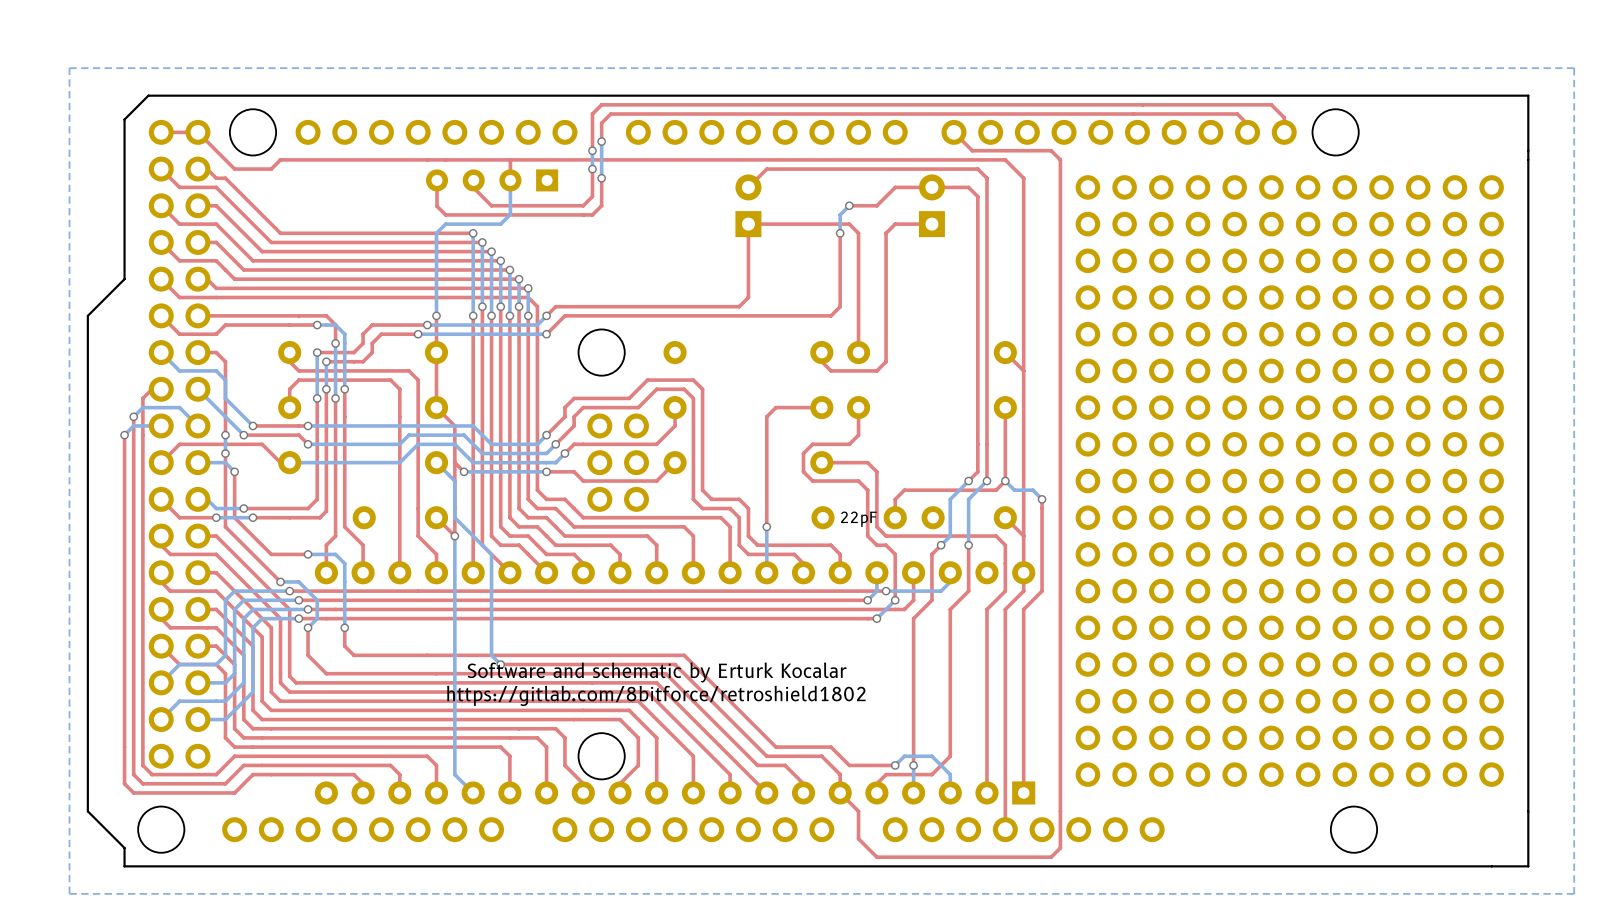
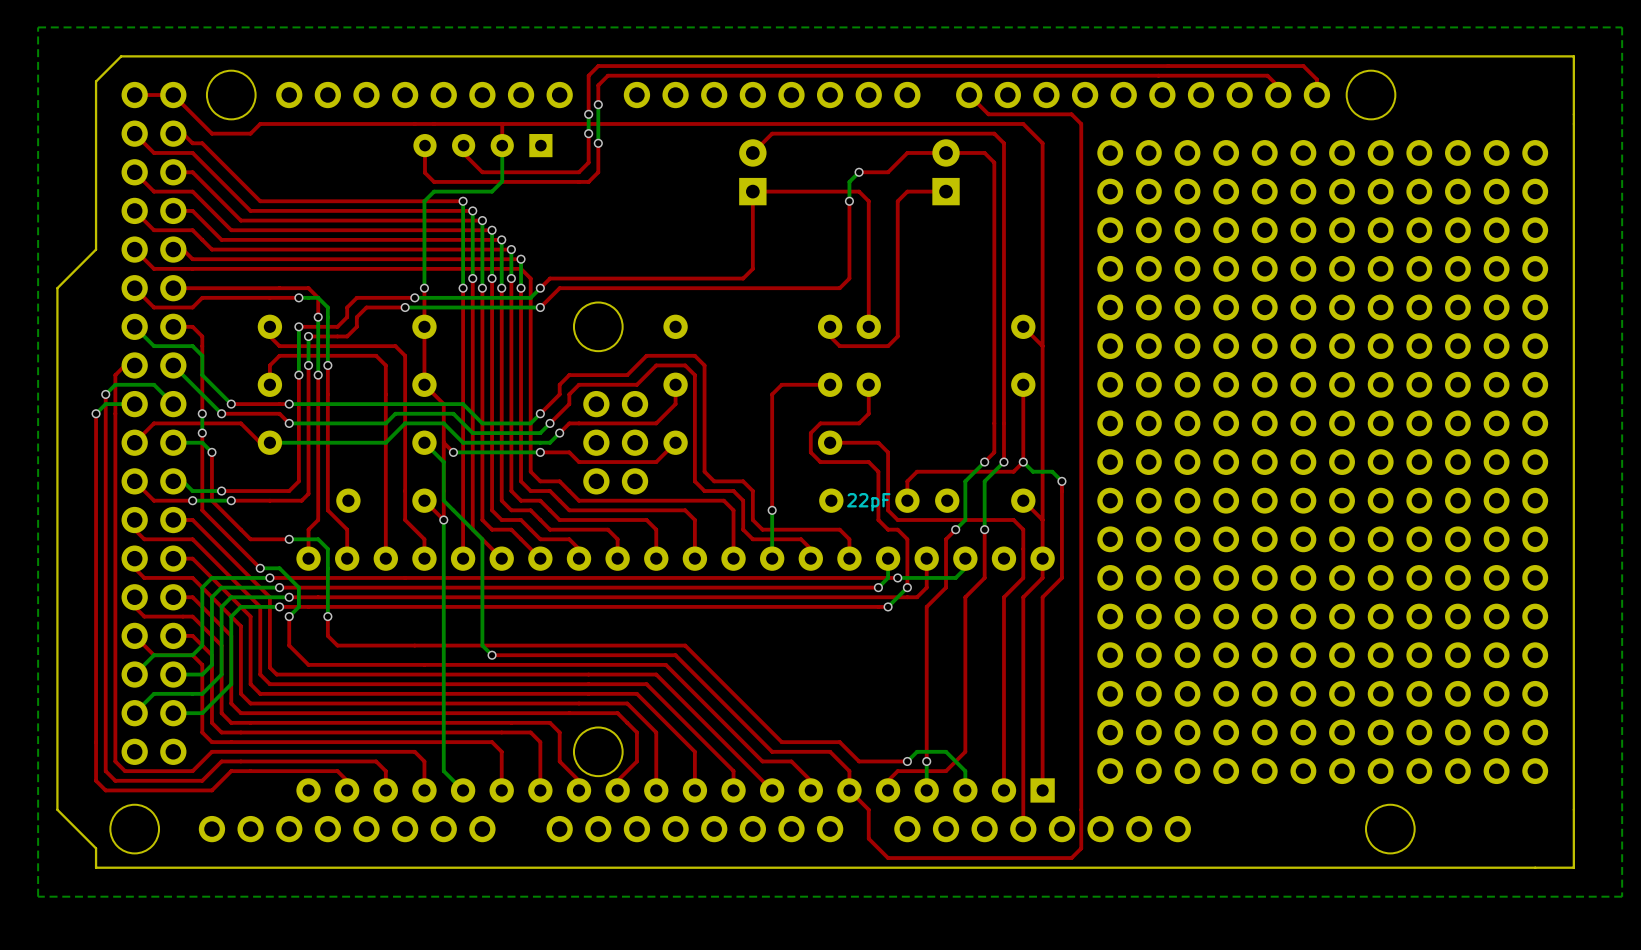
text: Software and schematic by Erturk Kocalar (657, 672) -> none
text: https://gitlab.com/8bitforce/retroshield1802 (656, 695) -> none

